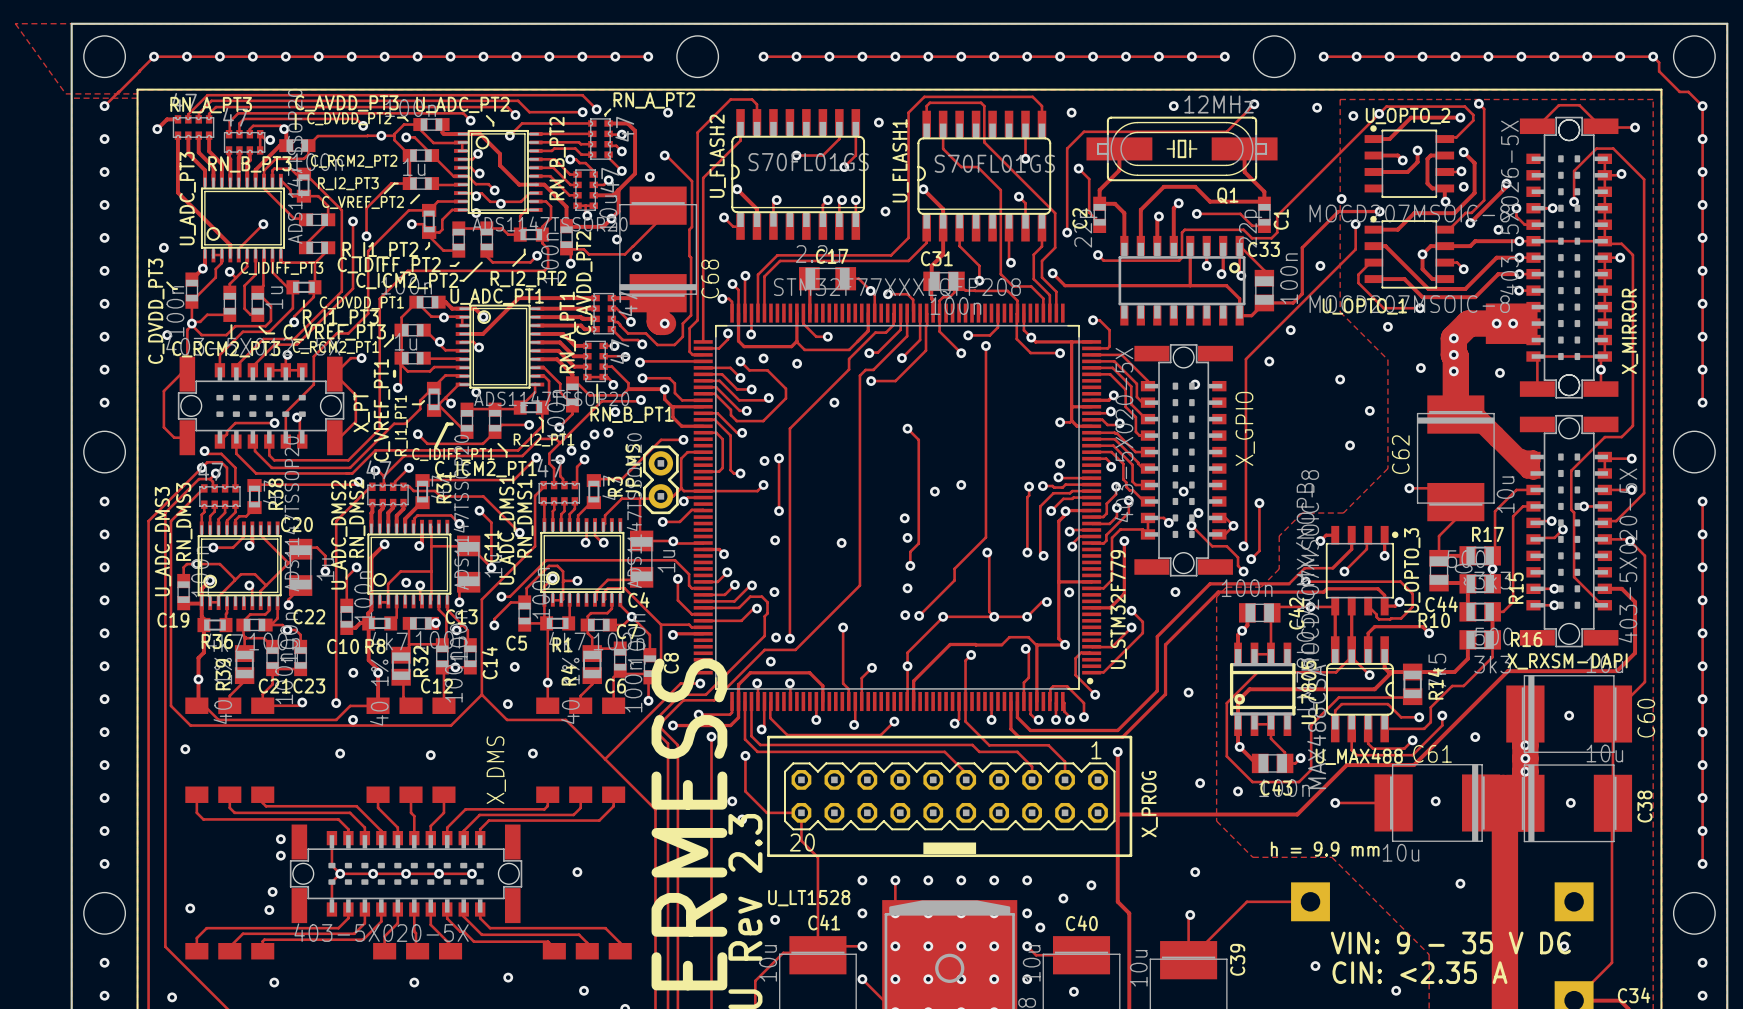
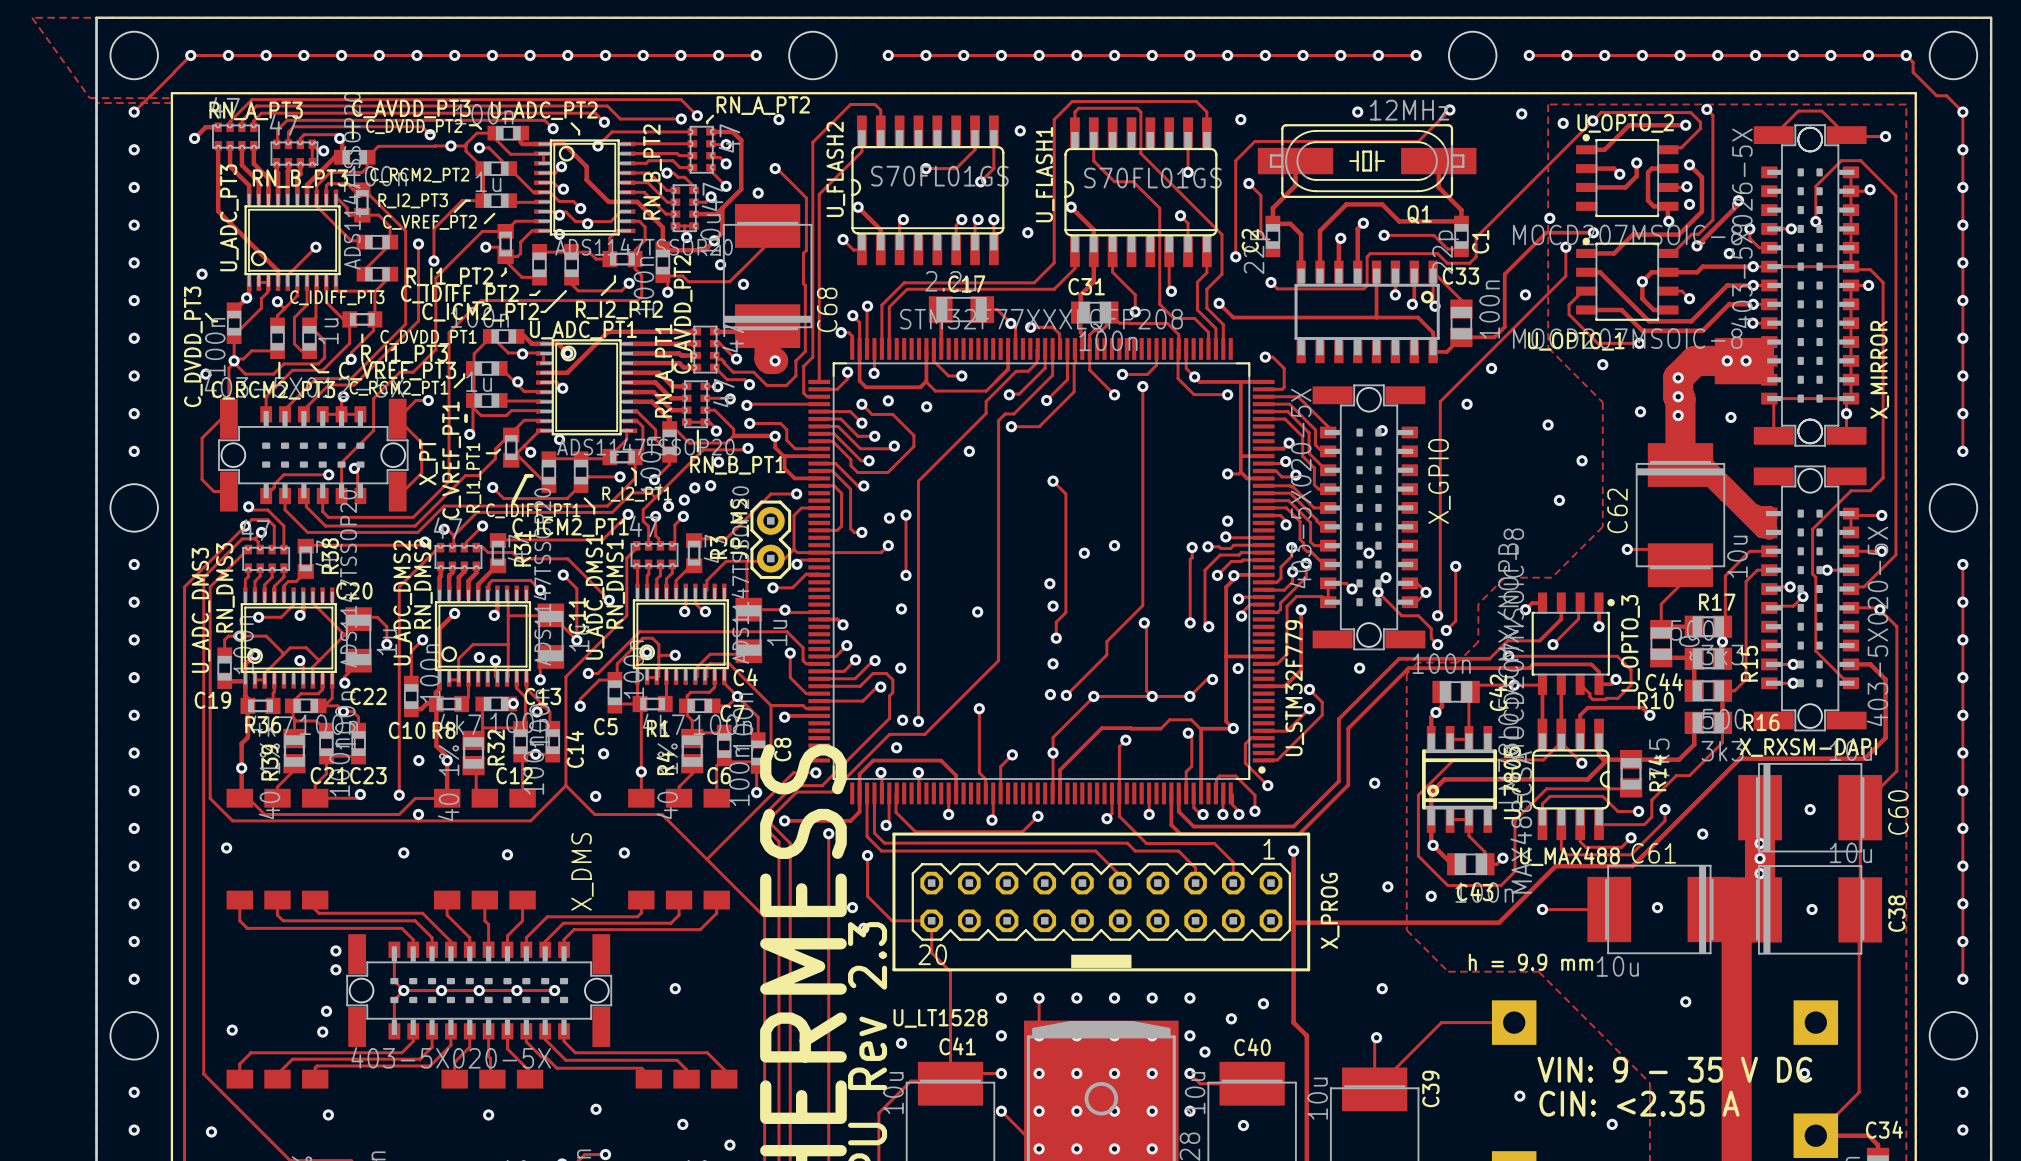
track: (732, 701) (732, 712) (730, 714) (698, 714) -> none
via: (698, 714) -> none

